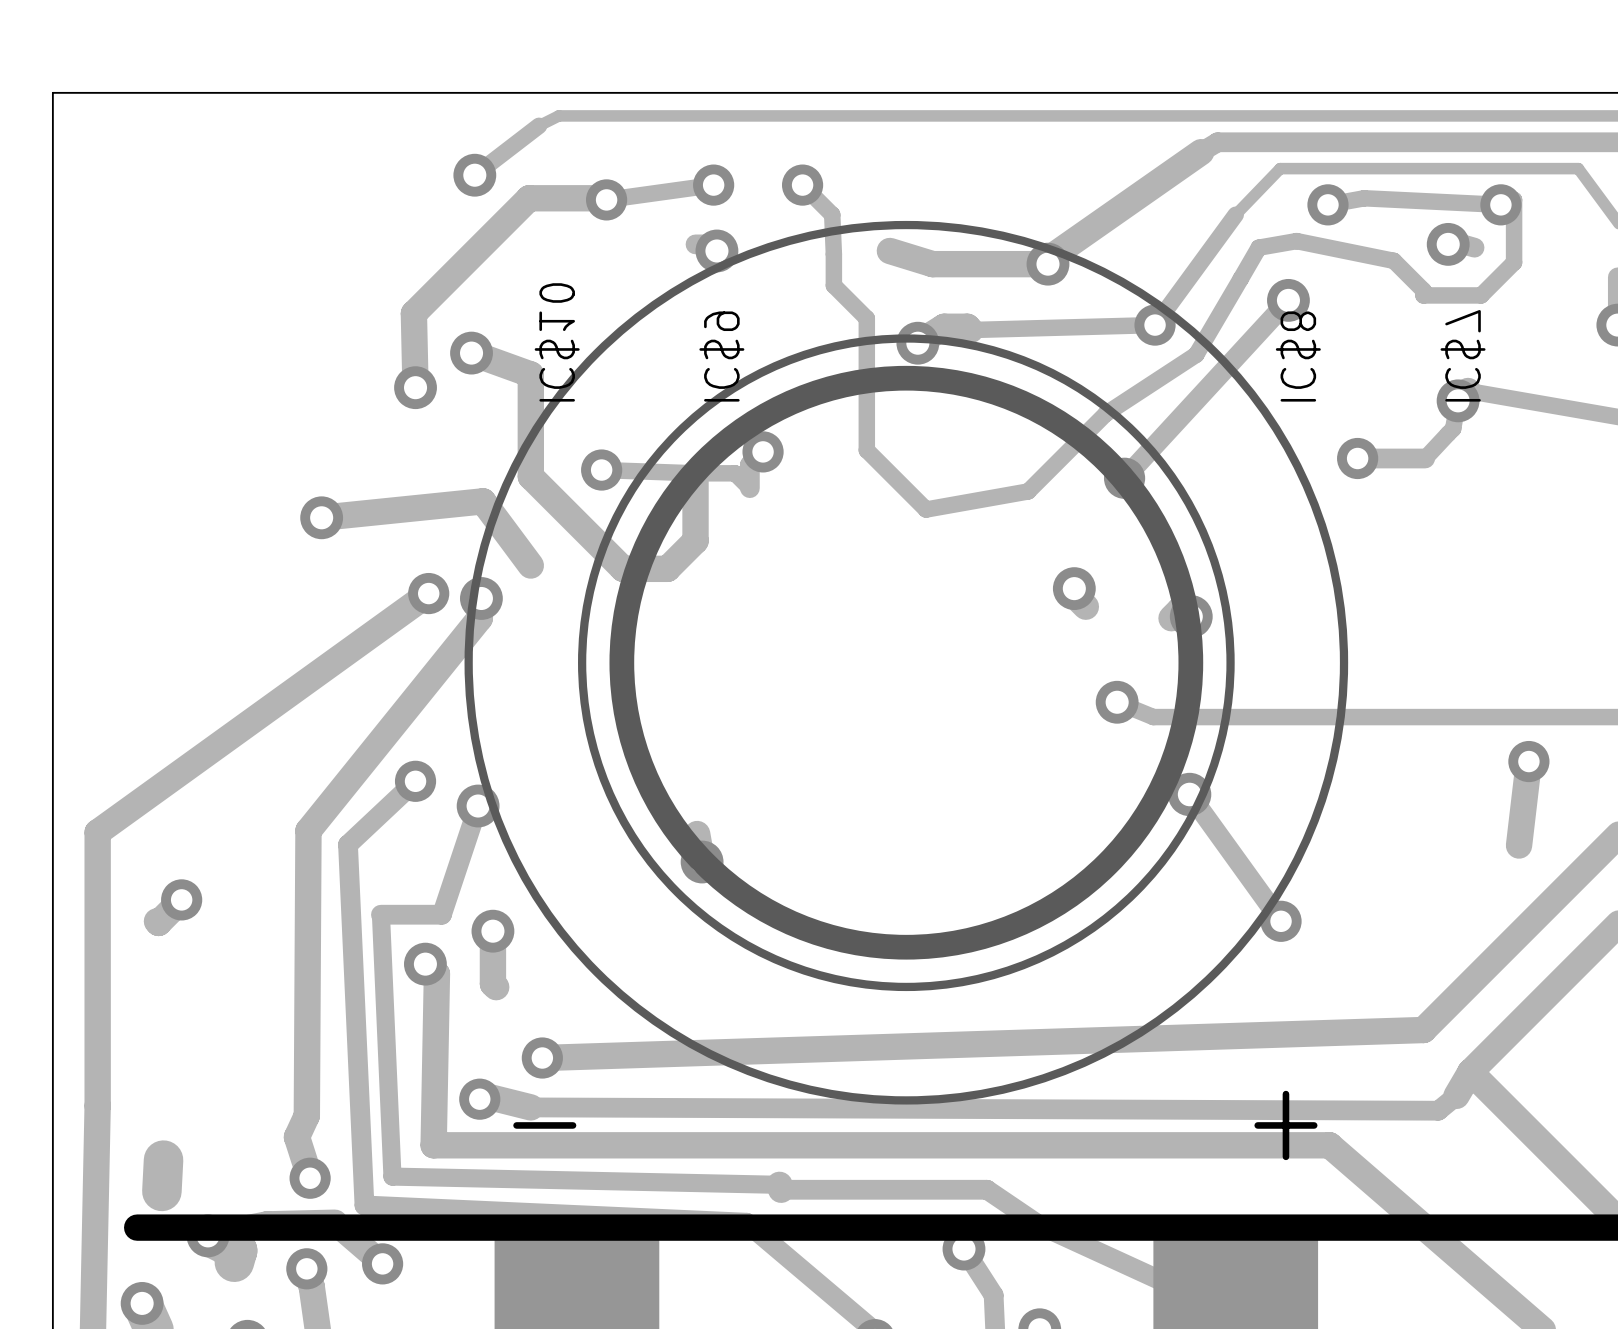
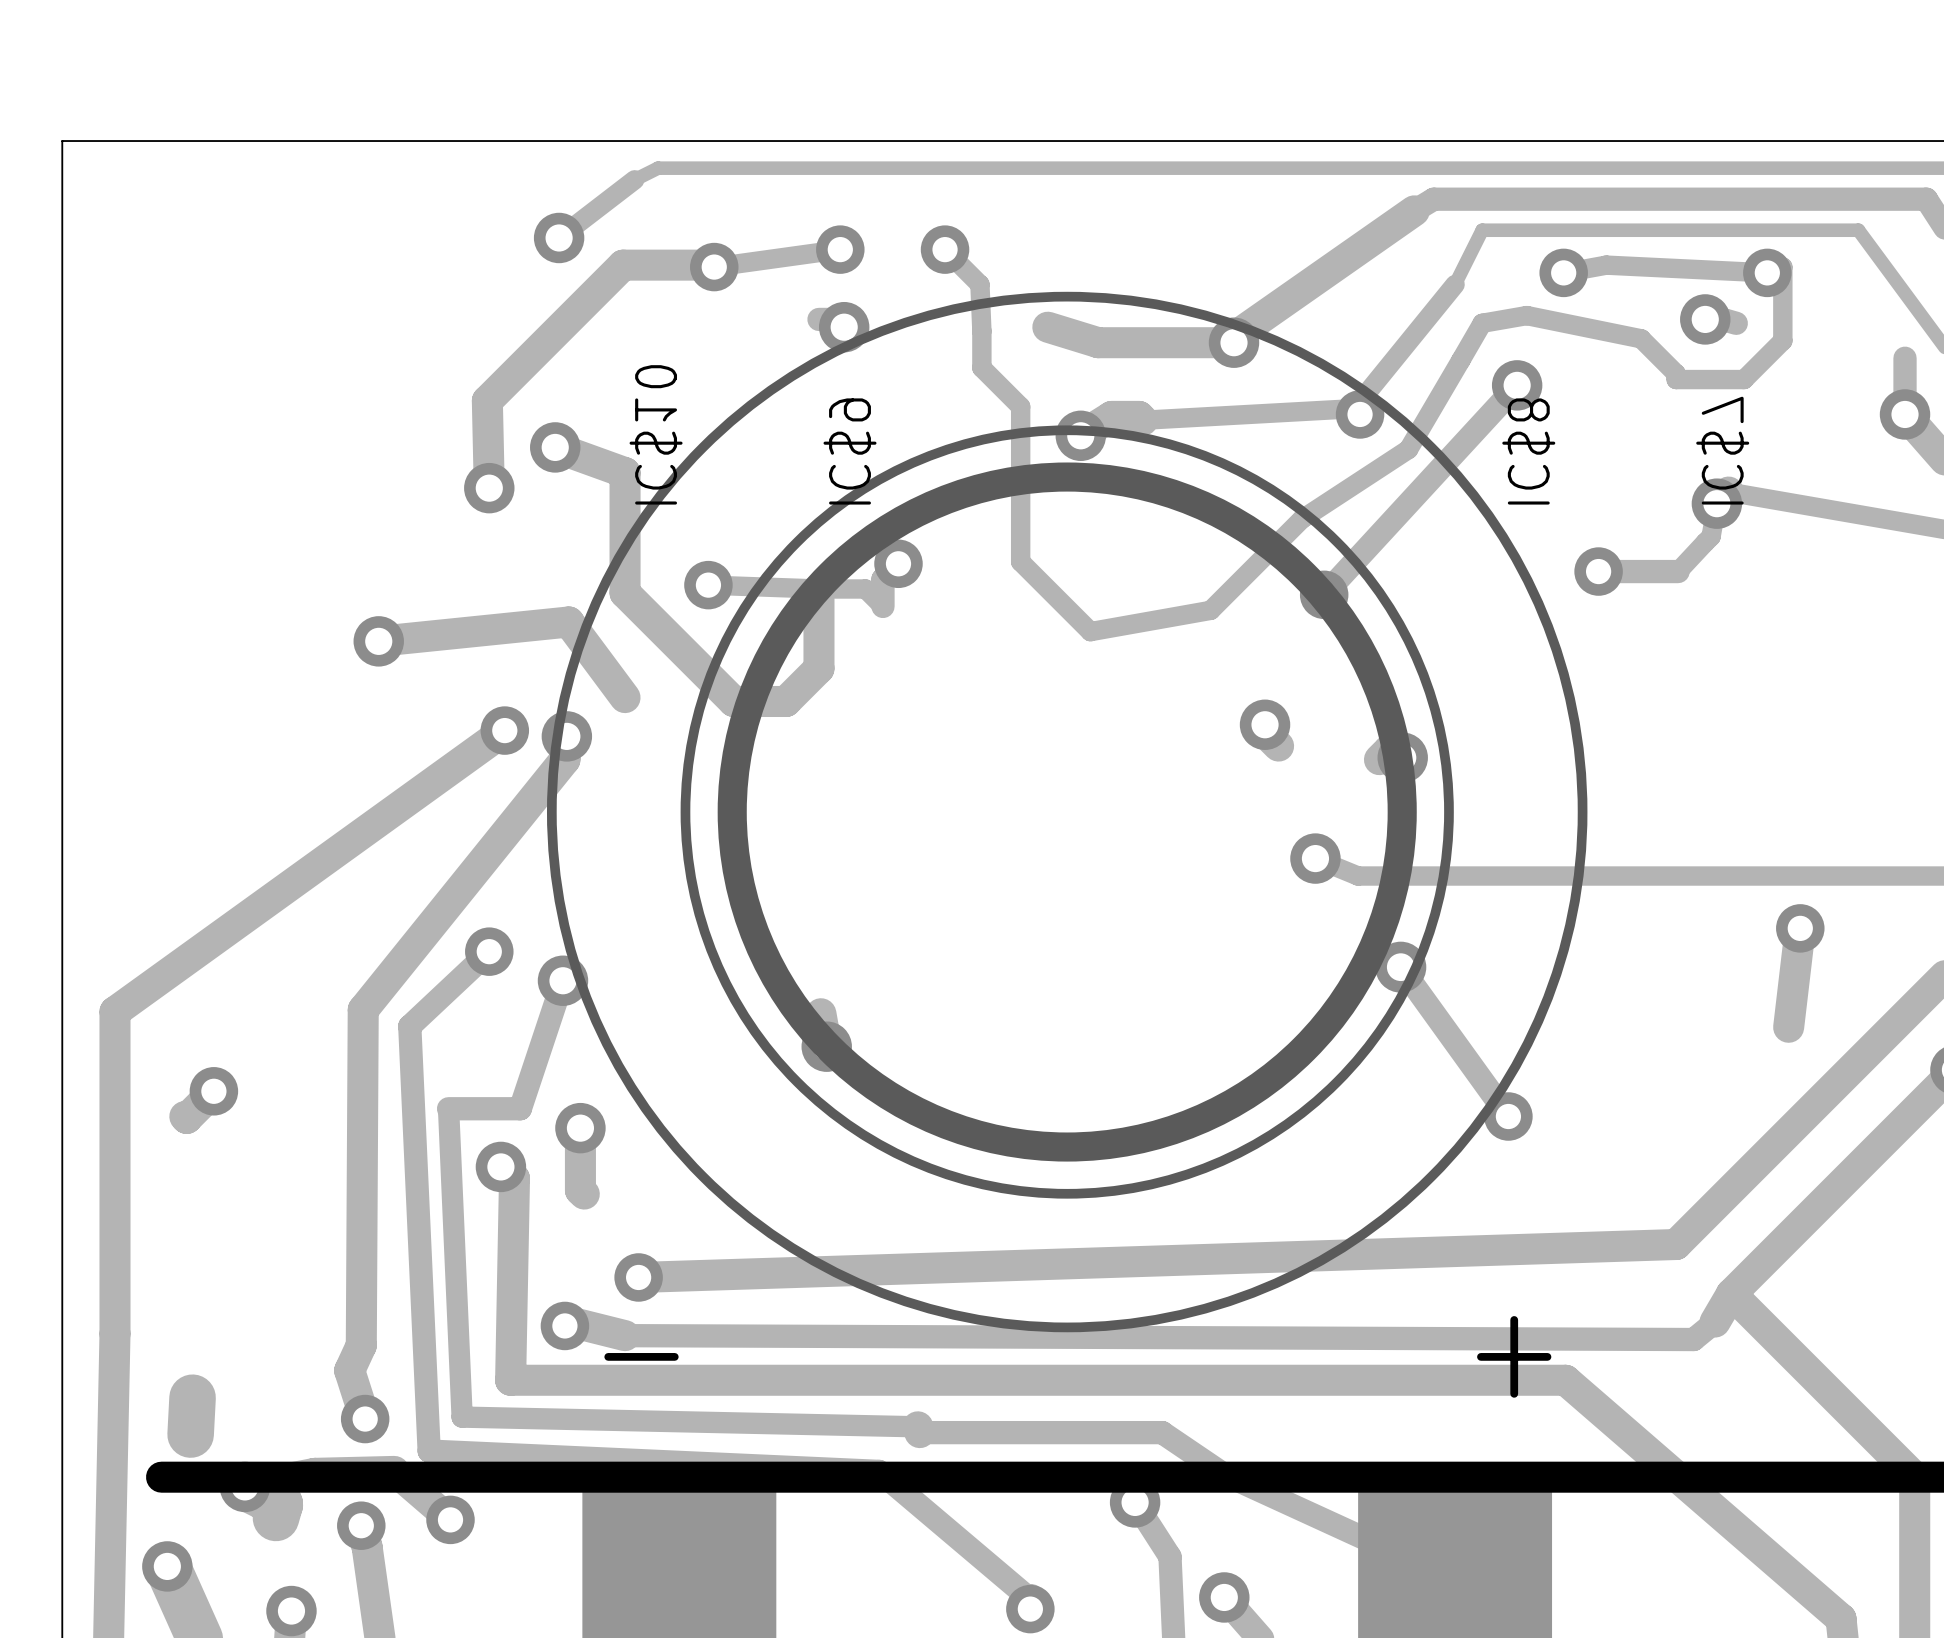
track: (1280, 168) (1235, 214) (1155, 325) (970, 330) -> (1507, 230) (1482, 230) (1455, 284) (1354, 408) (1142, 420)

